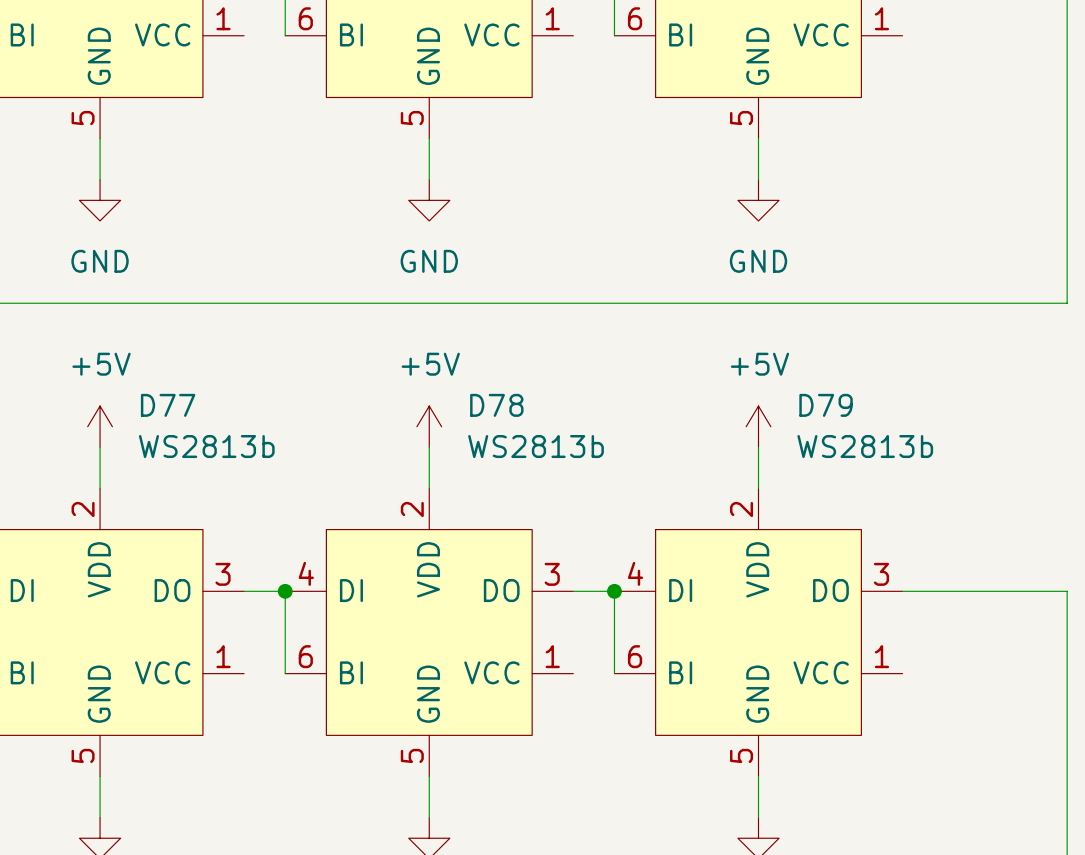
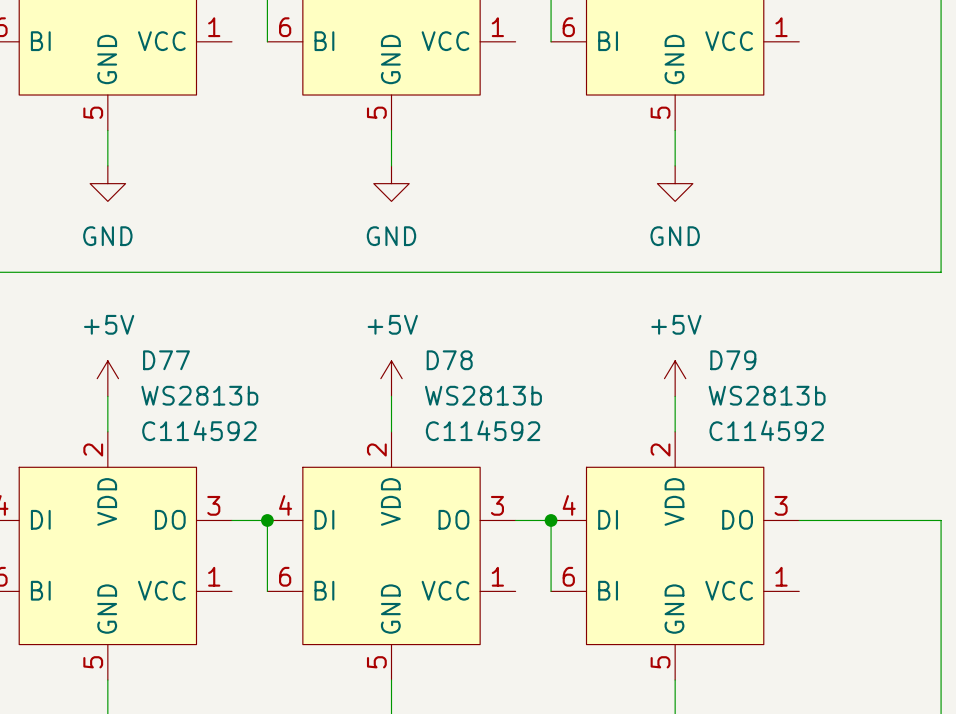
D77 text: none -> C114592 (199, 430)
D78 text: none -> C114592 (483, 430)
D79 text: none -> C114592 (766, 430)

